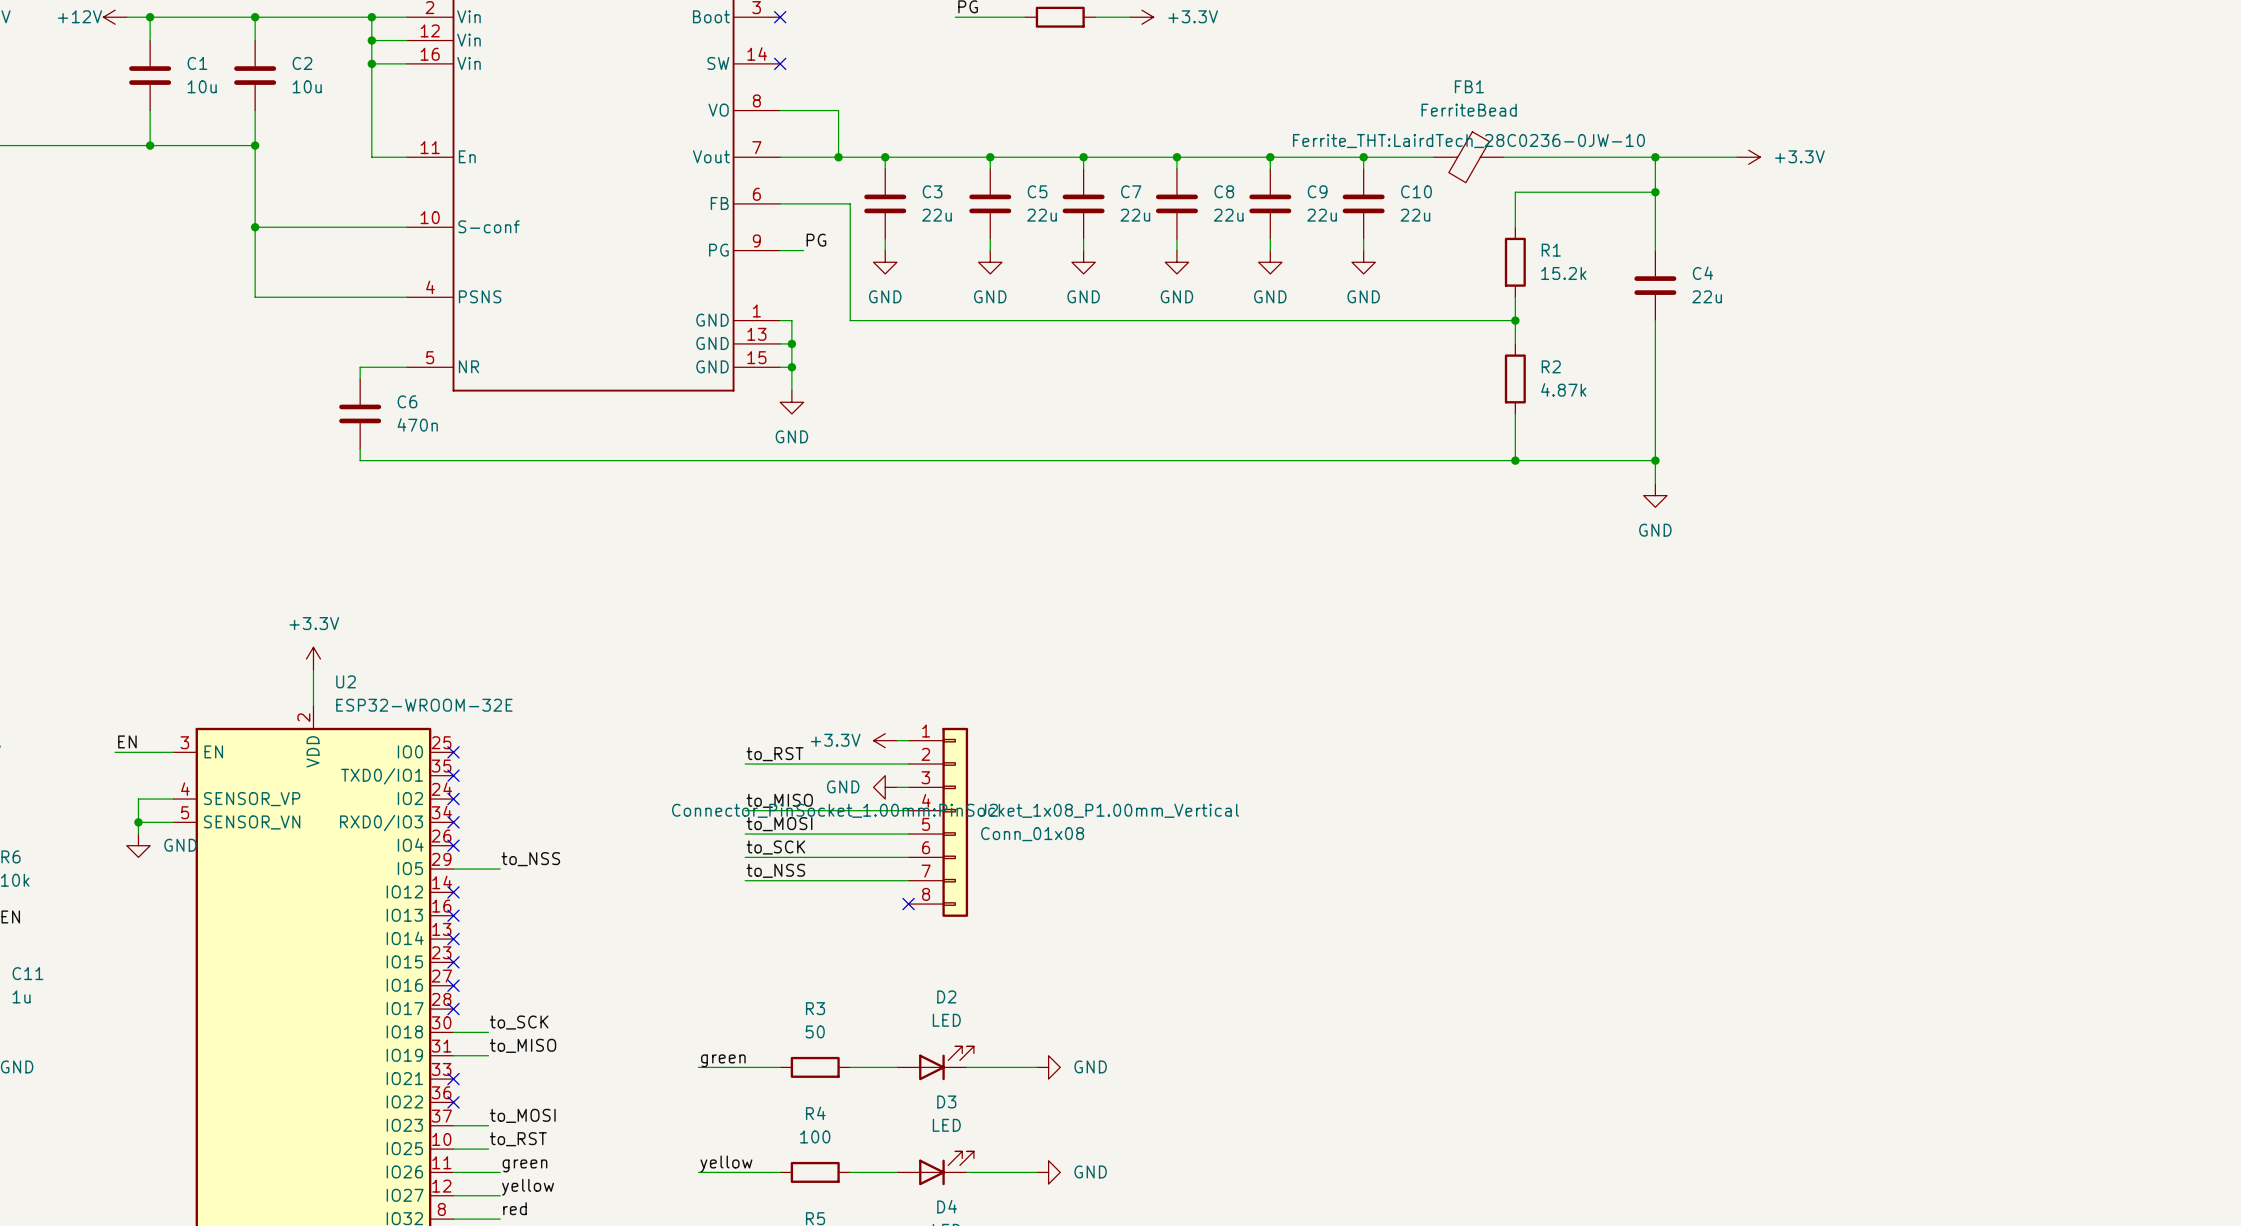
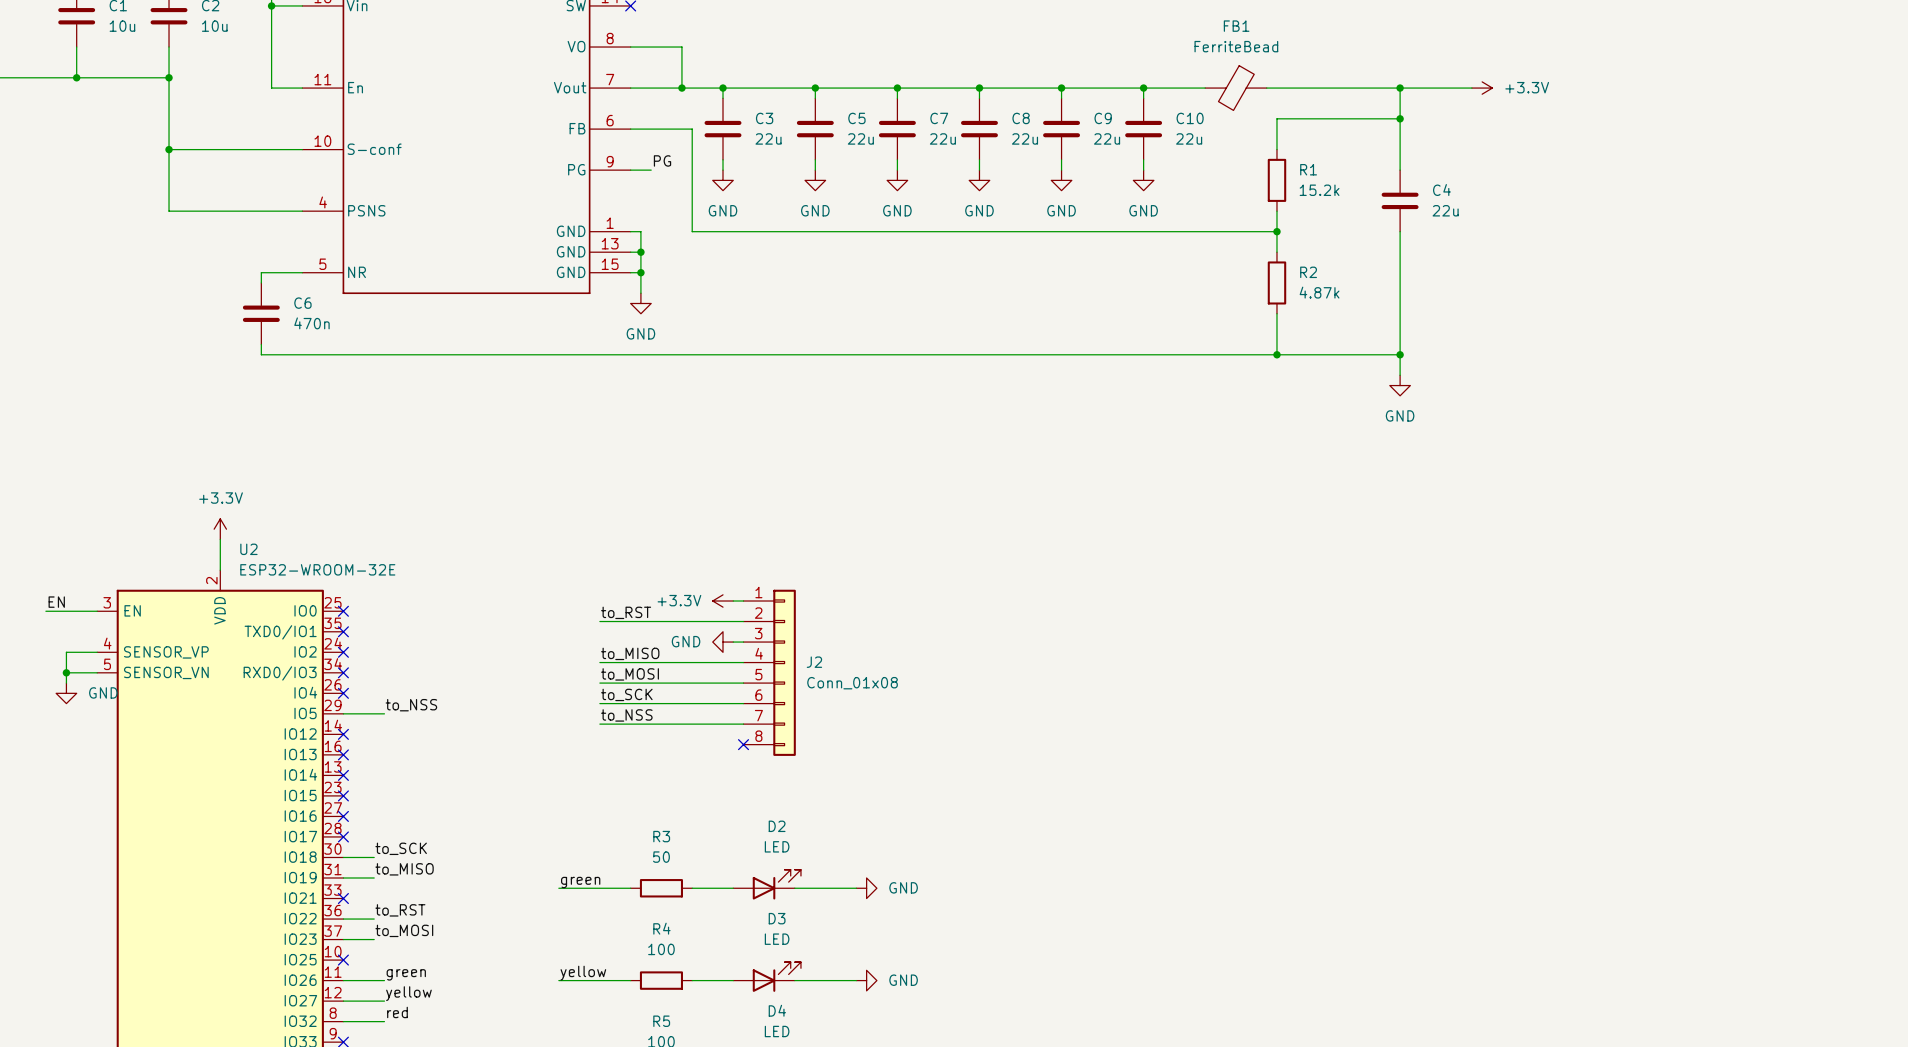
FB1 text: Ferrite_THT:LairdTech_28C0236-0JW-10 (1468, 141) -> none
J2 text: Connector_PinSocket_1.00mm:PinSocket_1x08_P1.00mm_Vertical (955, 810) -> none
no-connect mark position: (453, 1102) -> (343, 960)
label position: to_RST (518, 1139) -> to_RST (400, 910)
wire: (453, 1149) (488, 1149) -> (343, 919) (374, 919)

